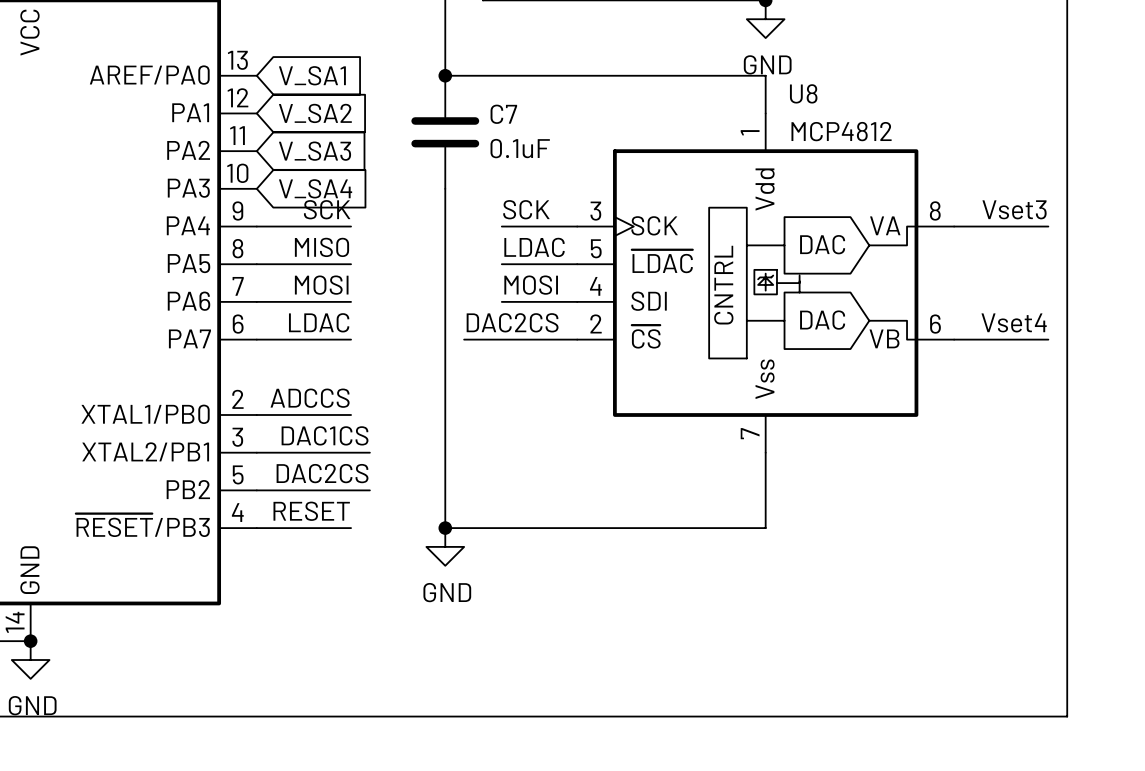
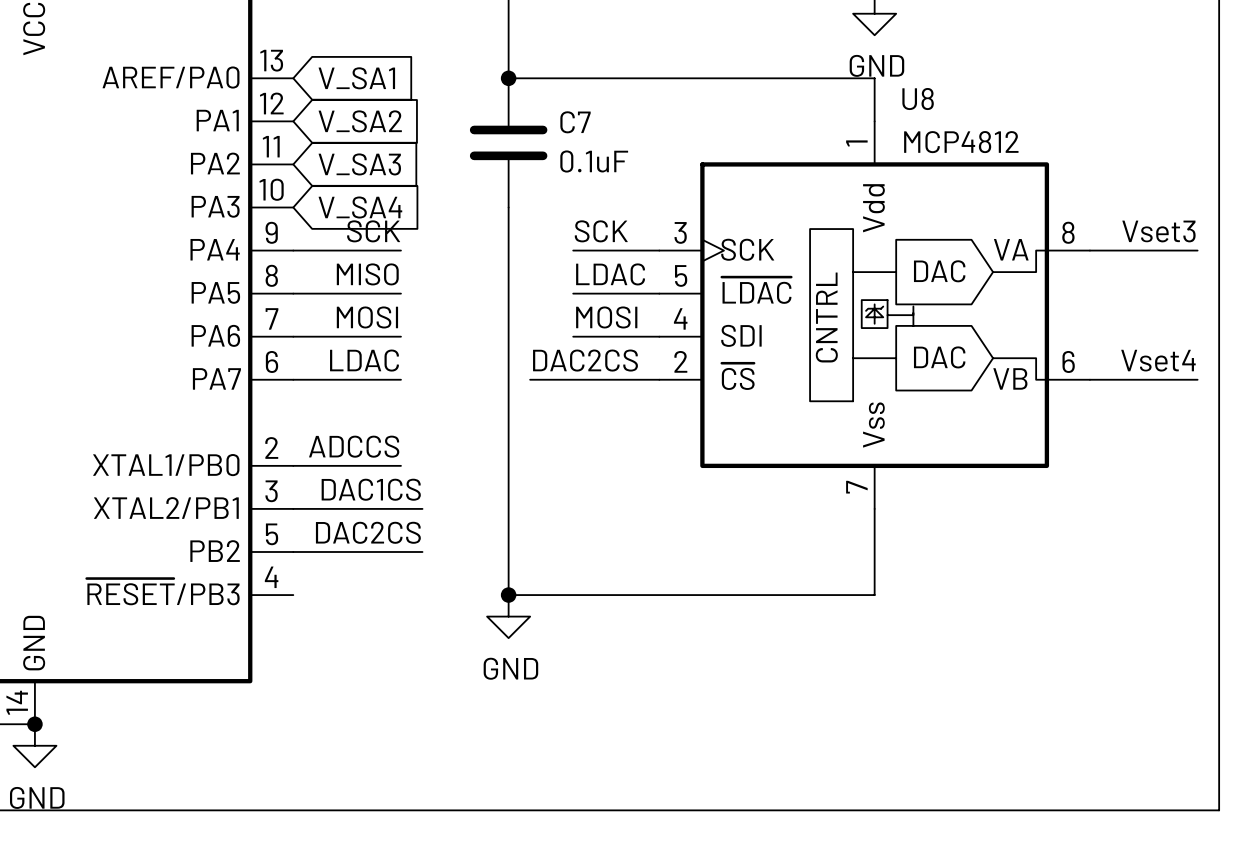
label: RESET (311, 511) -> none
wire: (256, 528) (351, 528) -> none

